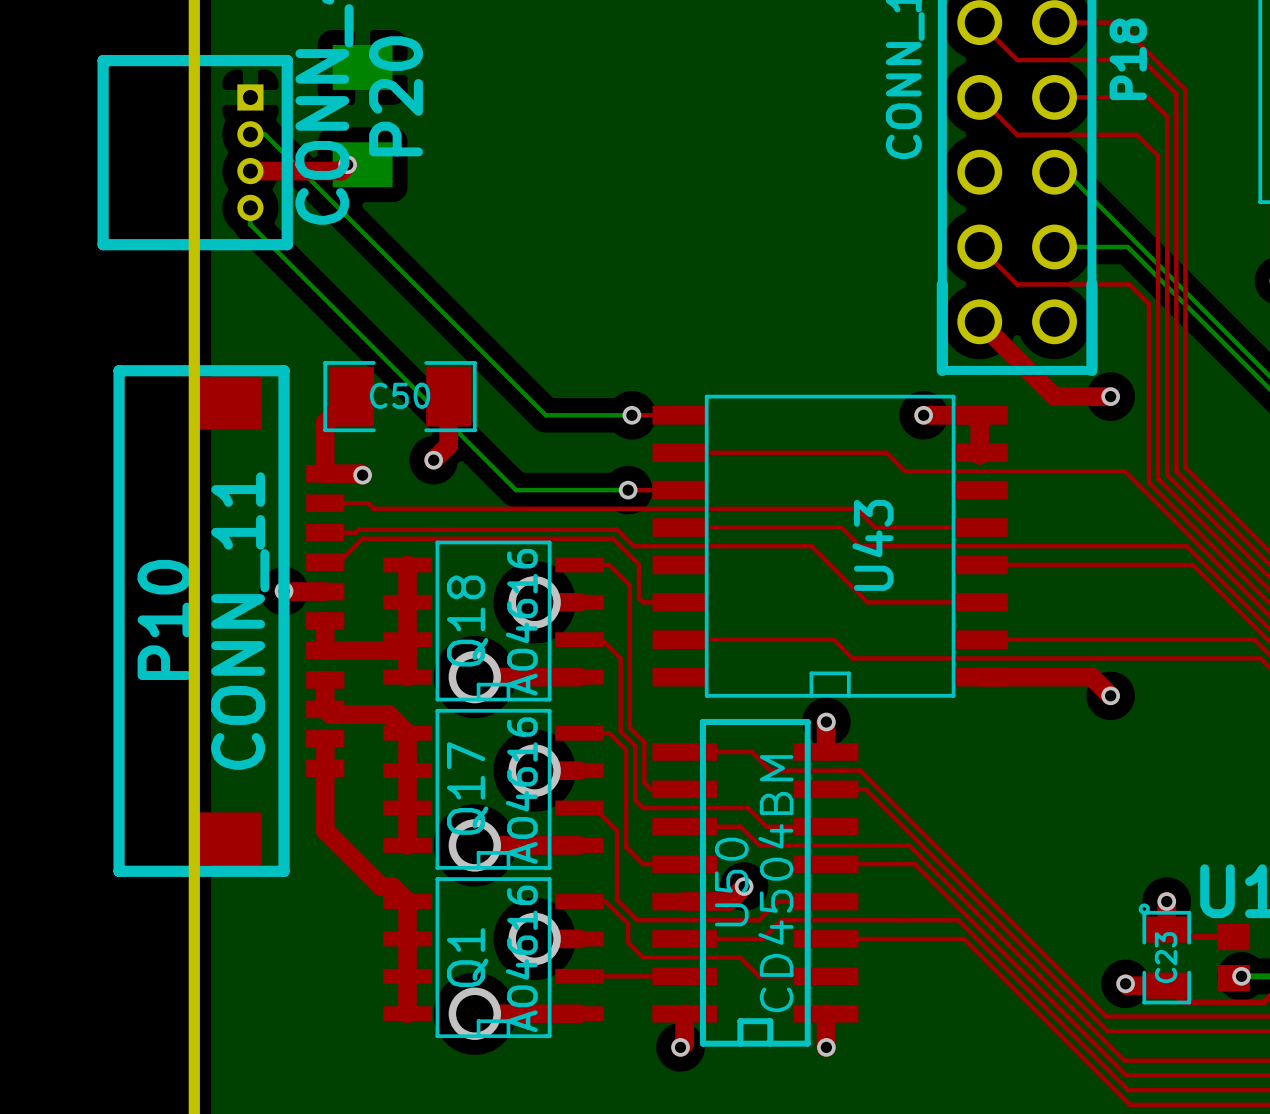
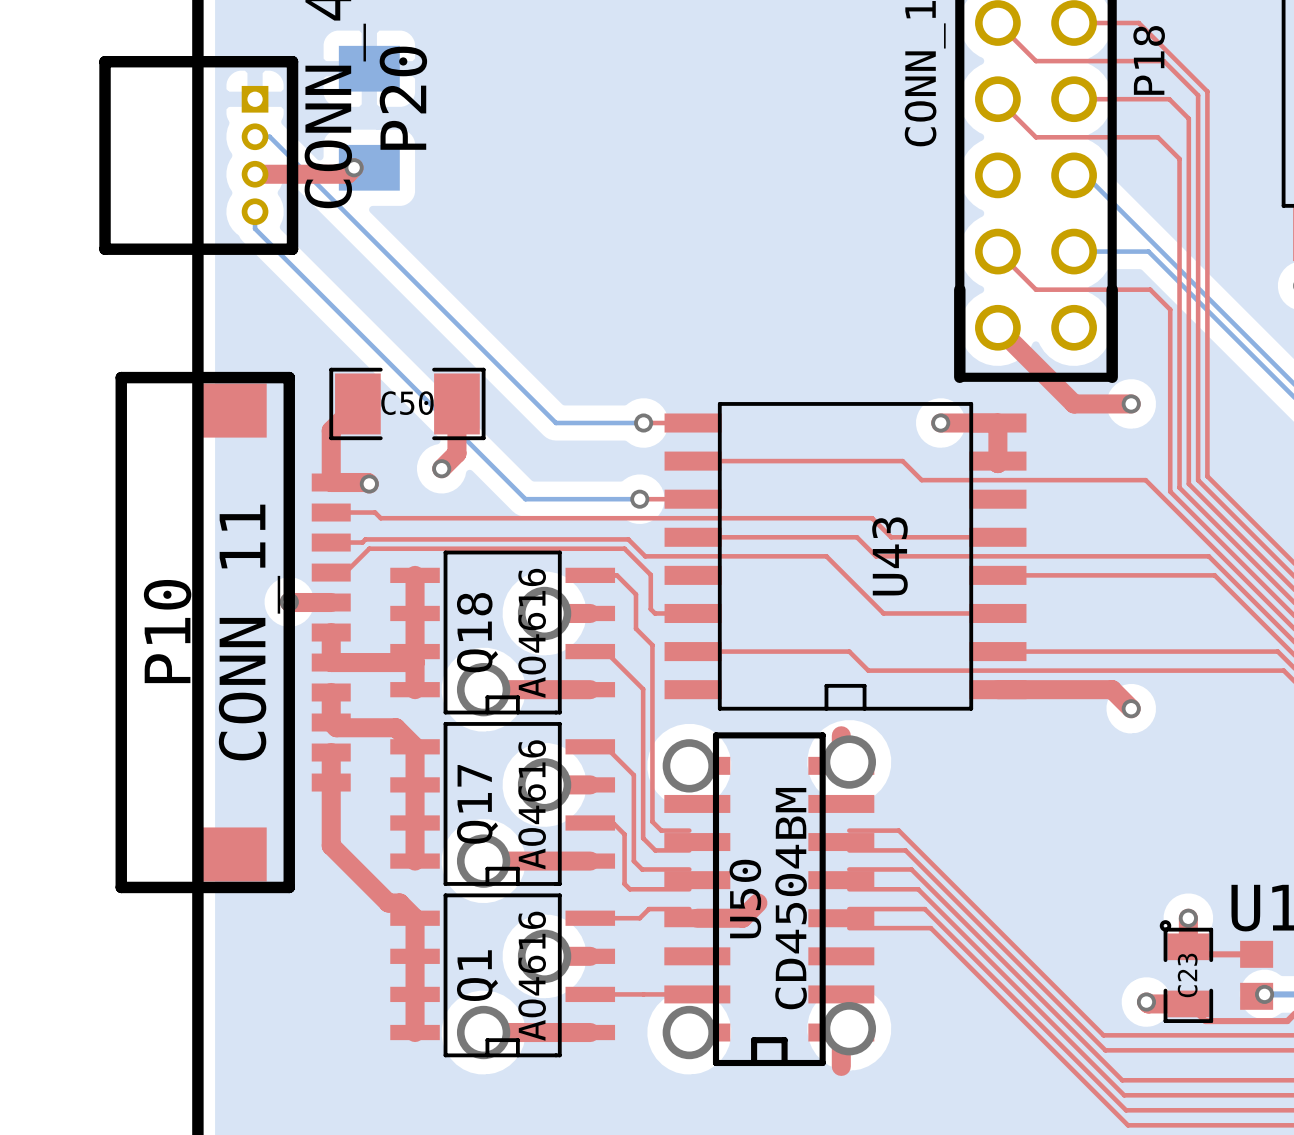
top track: (605, 564) (609, 564) (629, 585) (629, 727) (644, 742) (644, 783) (650, 789) (684, 789) -> (616, 575) (635, 594) (635, 628) (652, 645) (652, 821) (661, 830) (689, 830)
top track: (594, 639) (601, 639) (620, 658) (620, 731) (635, 746) (635, 800) (643, 808) (747, 808) (766, 826) (826, 826) -> (605, 651) (643, 689) (643, 838) (655, 850) (689, 850)
via size: [817, 712, 836, 732] -> [822, 735, 876, 789]
top track: (594, 733) (609, 733) (626, 749) (626, 847) (643, 864) (684, 864) -> (605, 746) (633, 775) (633, 861) (642, 869) (689, 869)
via: none -> (689, 765)
top track: (684, 751) (751, 751) (770, 770) (860, 770) (1105, 1016) -> (849, 830) (898, 830) (1103, 1035) (1126, 1035)
top track: (826, 789) (865, 789) (1107, 1031) -> (849, 850) (905, 850) (1105, 1050) (1128, 1050)
top track: (594, 808) (616, 830) (616, 899) (637, 920) (759, 920) (777, 901) (826, 901) -> (605, 822) (613, 822) (624, 834) (624, 883) (629, 889) (689, 889)
top track: (684, 826) (740, 826) (759, 845) (909, 845) (1124, 1060) -> (849, 869) (911, 869) (1122, 1080) (1145, 1080)
top track: (826, 864) (914, 864) (1126, 1075) -> (849, 889) (918, 889) (1124, 1095) (1147, 1095)
via: (744, 886) -> none
top track: (605, 901) (628, 923) (628, 942) (643, 957) (740, 957) (759, 976) (826, 976) -> (616, 918) (639, 918) (648, 909) (689, 909)
top track: (684, 938) (762, 938) (781, 920) (958, 920) (1128, 1090) -> (849, 909) (924, 909) (1126, 1110) (1148, 1110)
top track: (826, 938) (964, 938) (1129, 1104) -> (849, 928) (930, 928) (1128, 1125) (1150, 1125)
via: none -> (849, 1028)
via: none -> (689, 1032)
top track: (684, 1013) (684, 1043) (680, 1047) -> none
via: (680, 1047) -> none
via: (826, 1047) -> none

